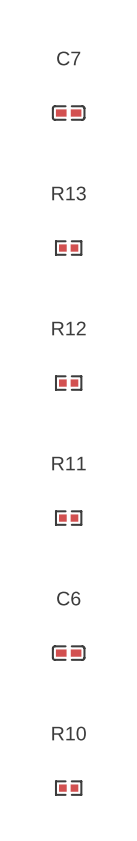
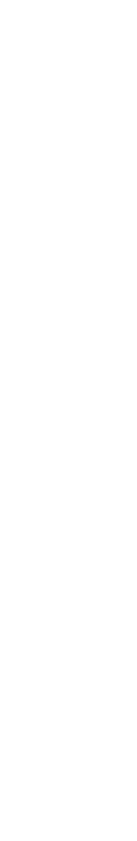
C7: (68, 113) -> none
R13: (68, 248) -> none
R12: (68, 383) -> none
R11: (68, 518) -> none
C6: (68, 653) -> none
R10: (68, 788) -> none

